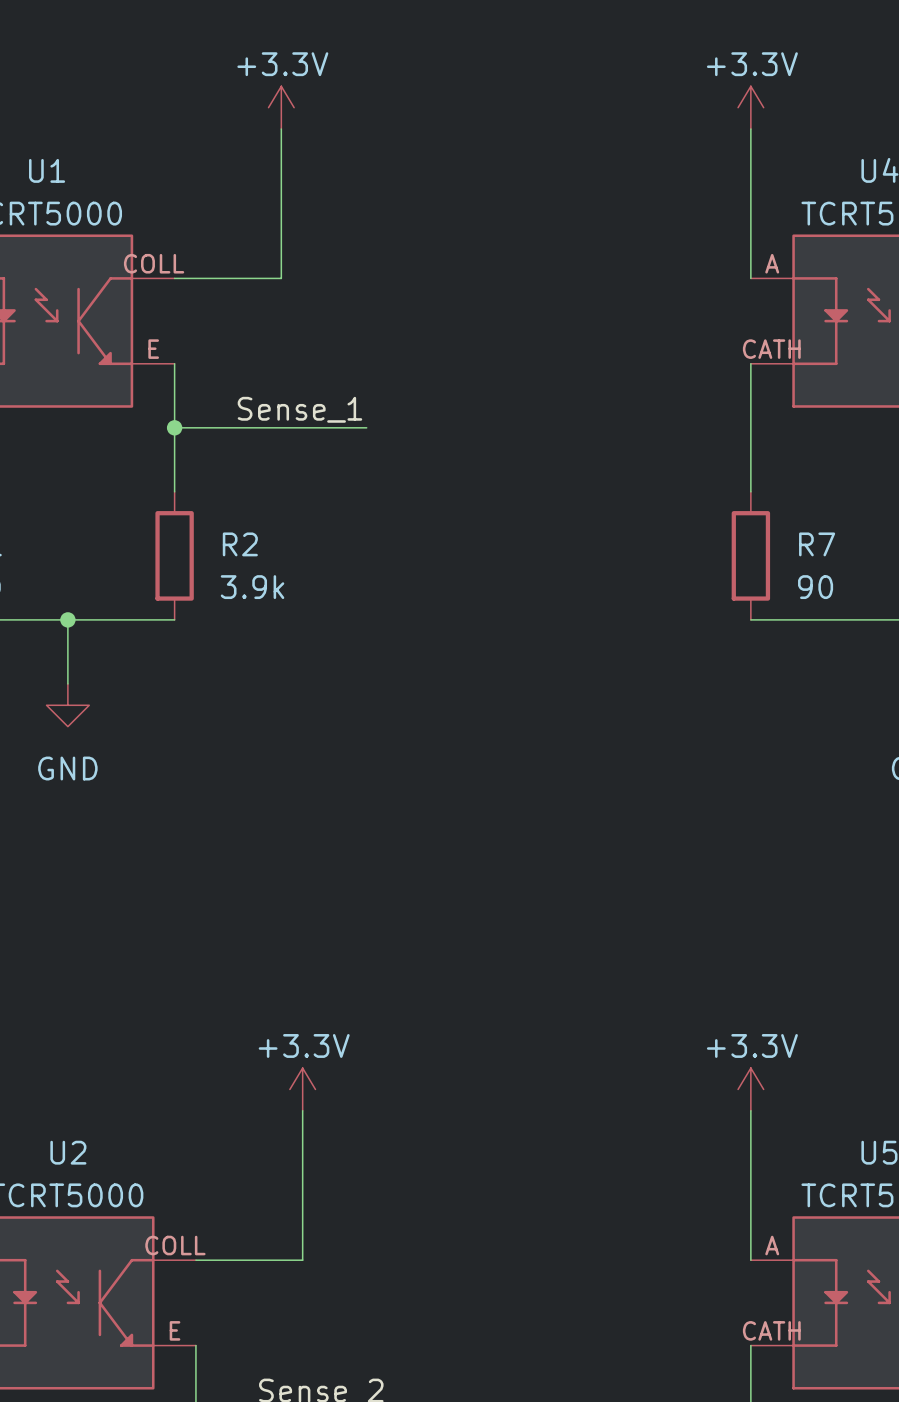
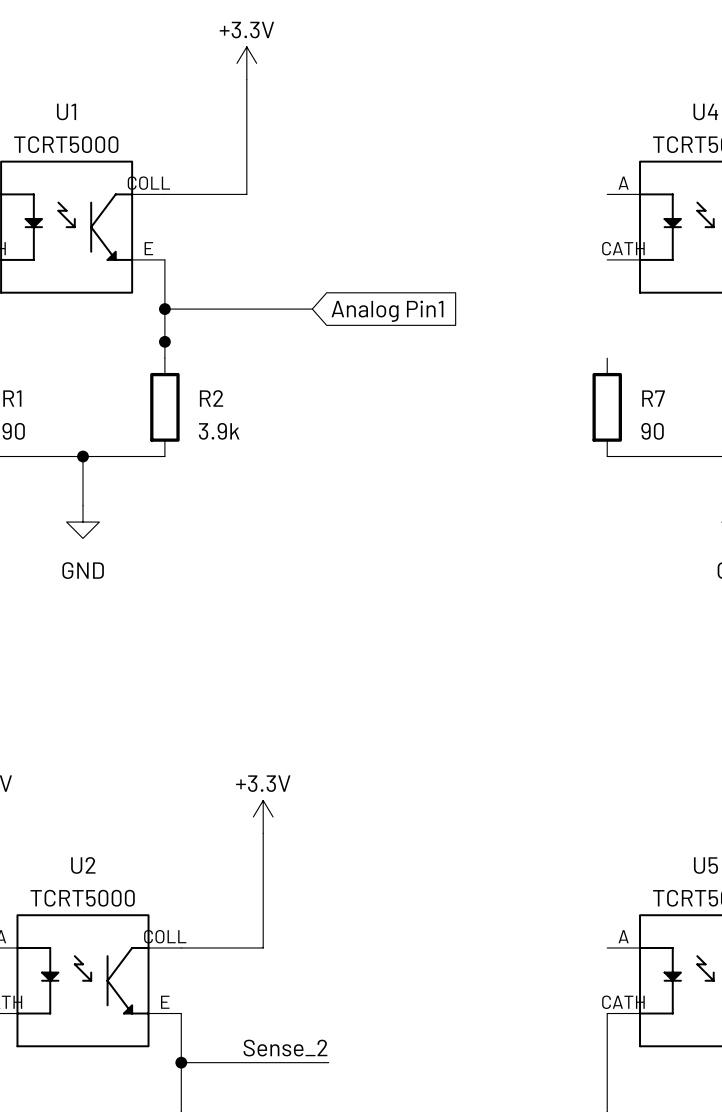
power symbol: +3.3V (750, 107) -> none
wire: (750, 129) (750, 278) -> none
wire: (750, 363) (750, 491) -> none
label: Sense_1 (299, 409) -> none
global label: none -> Analog Pin1 (387, 311)
junction: none -> (164, 341)
power symbol: +3.3V (750, 1089) -> none
wire: (750, 1110) (750, 1260) -> none

